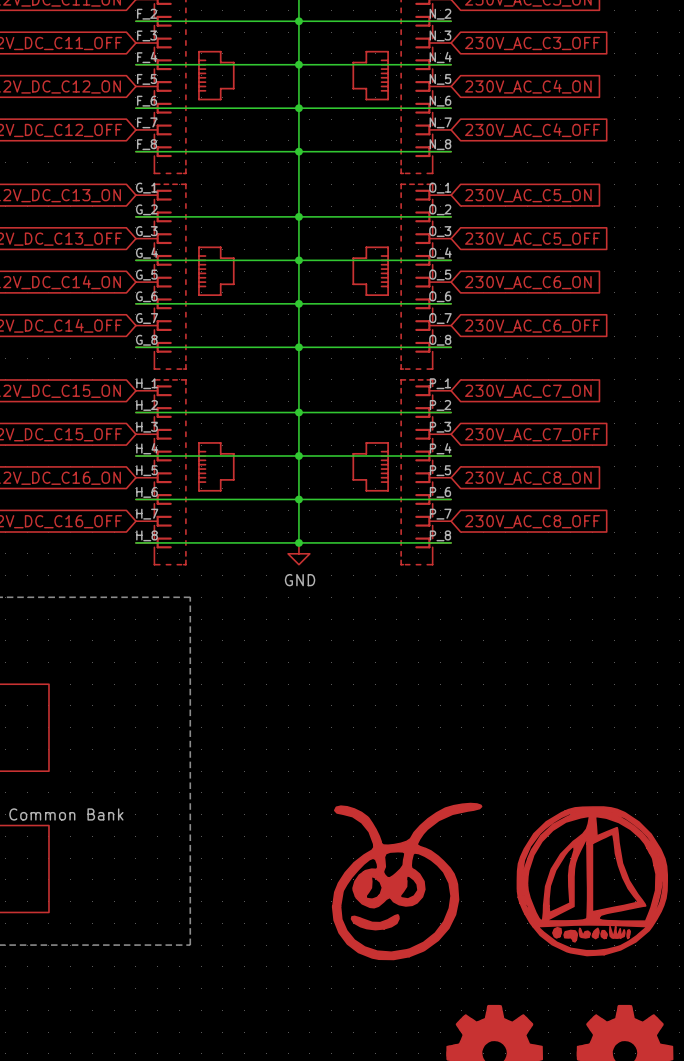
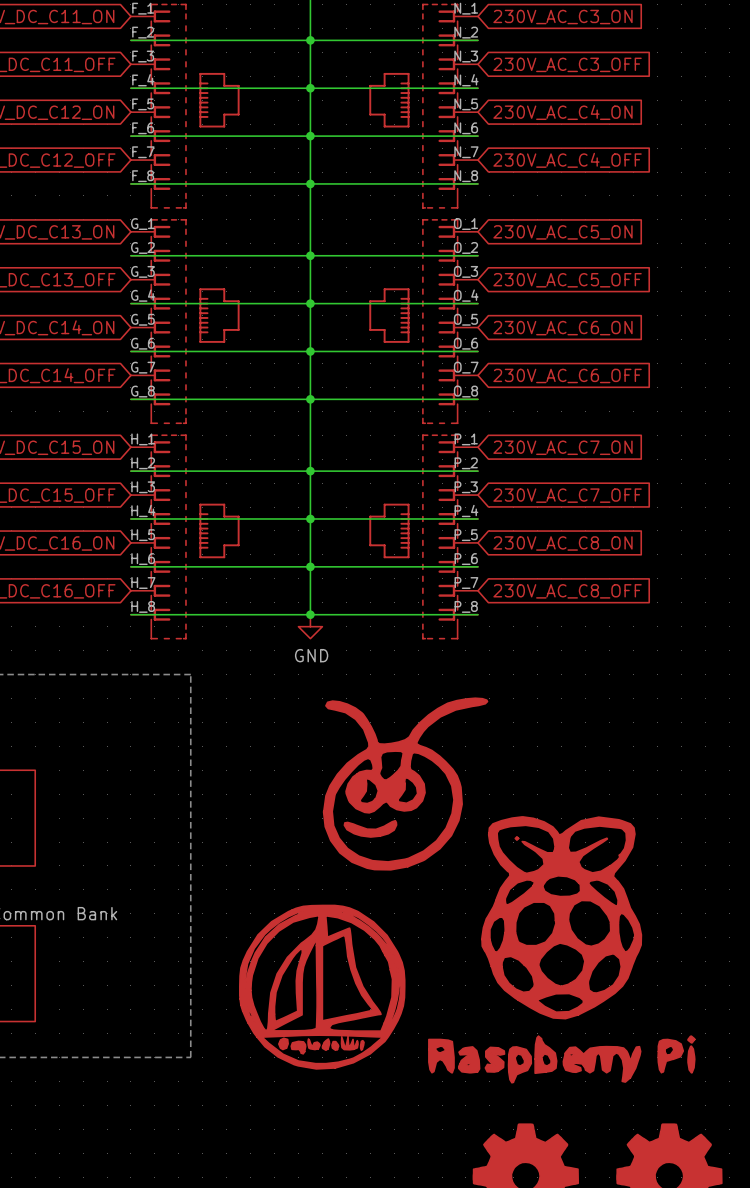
part: none -> (561, 949)
part: none -> (322, 987)
part position: (407, 881) -> (405, 784)
part: (592, 881) -> none

